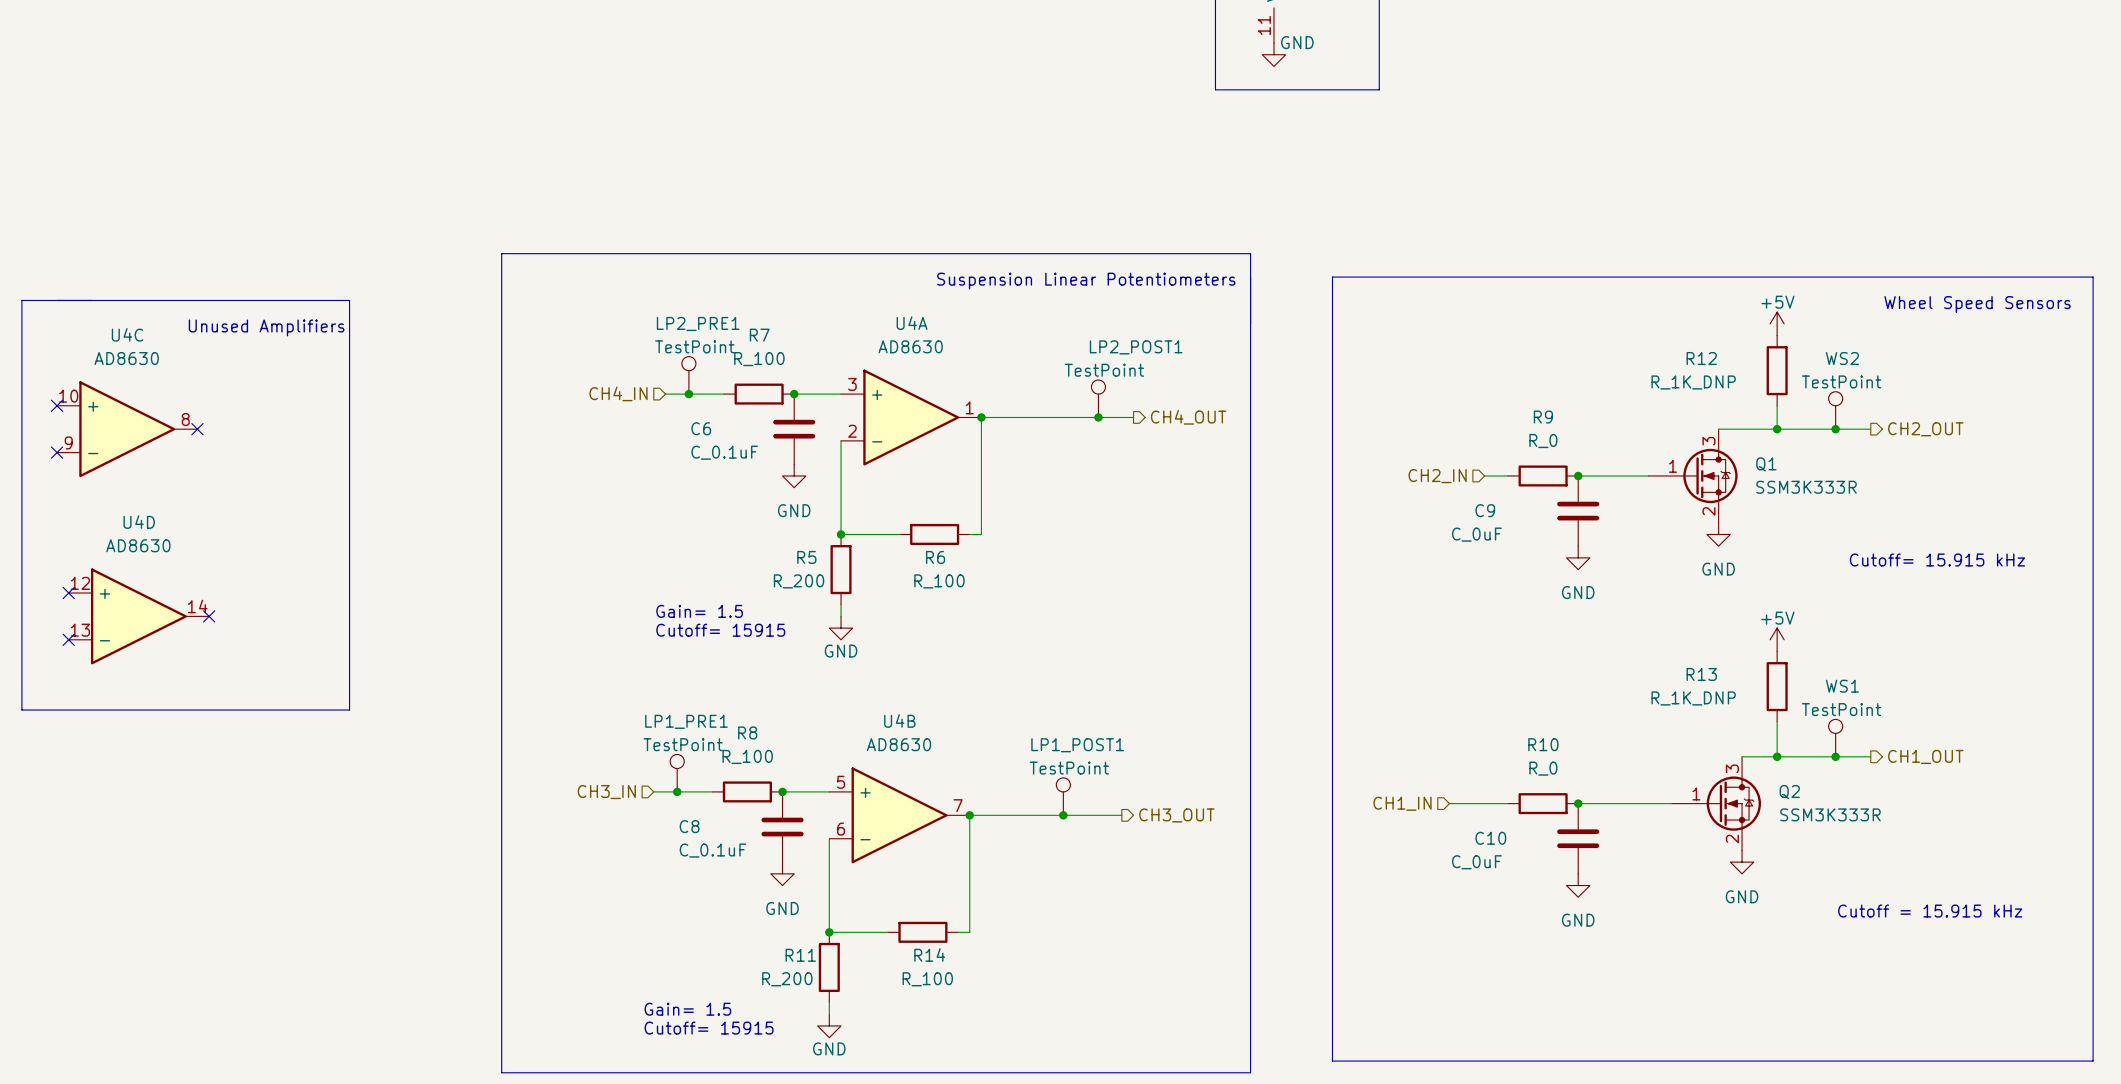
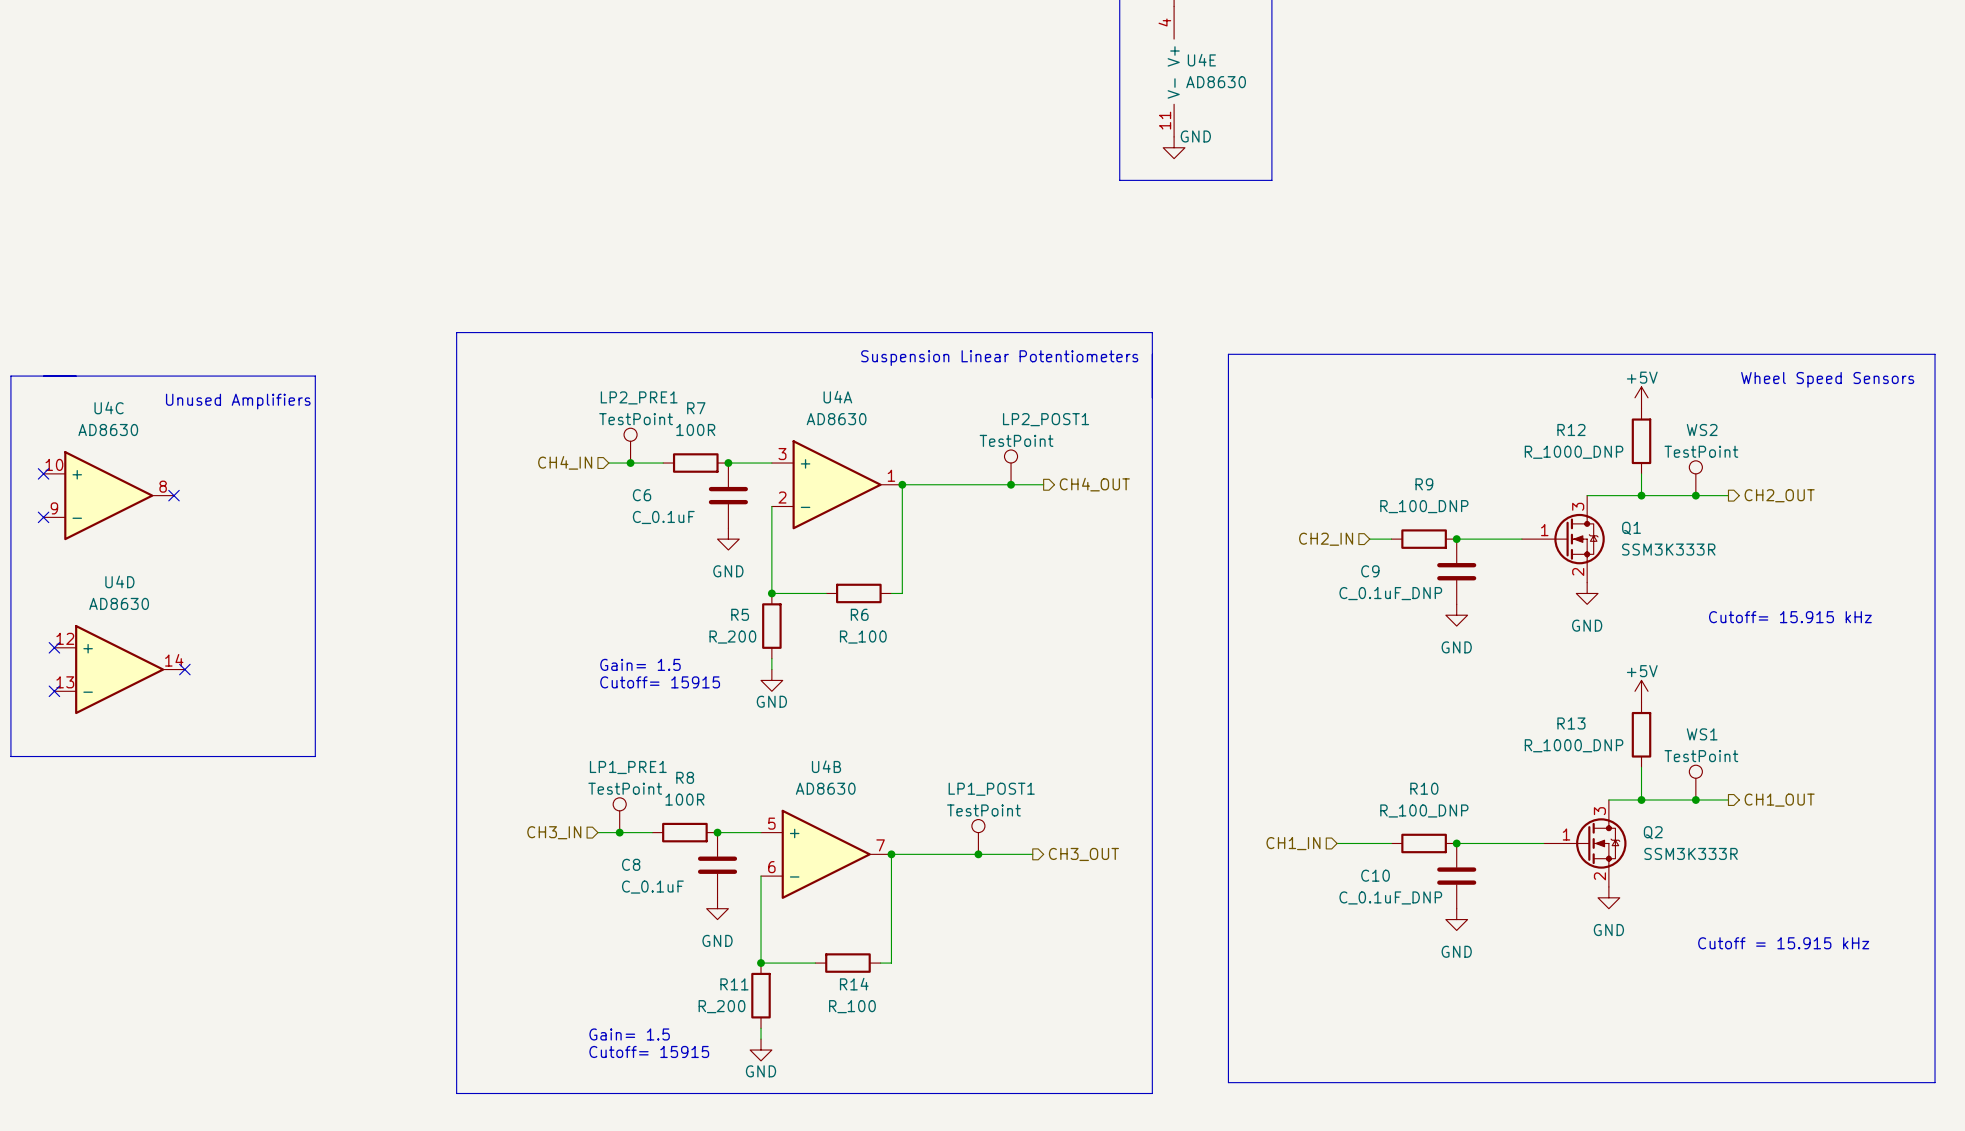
R7 value: R_100 (759, 359) -> 100R (695, 430)
R12 value: R_1K_DNP (1693, 382) -> R_1000_DNP (1574, 452)
R9 value: R_0 (1543, 441) -> R_100_DNP (1424, 506)
C9 value: C_0uF (1476, 534) -> C_0.1uF_DNP (1390, 593)
R13 value: R_1K_DNP (1693, 698) -> R_1000_DNP (1574, 745)
R8 value: R_100 (747, 756) -> 100R (684, 799)
R10 value: R_0 (1543, 768) -> R_100_DNP (1424, 810)
C10 value: C_0uF (1476, 862) -> C_0.1uF_DNP (1390, 897)

